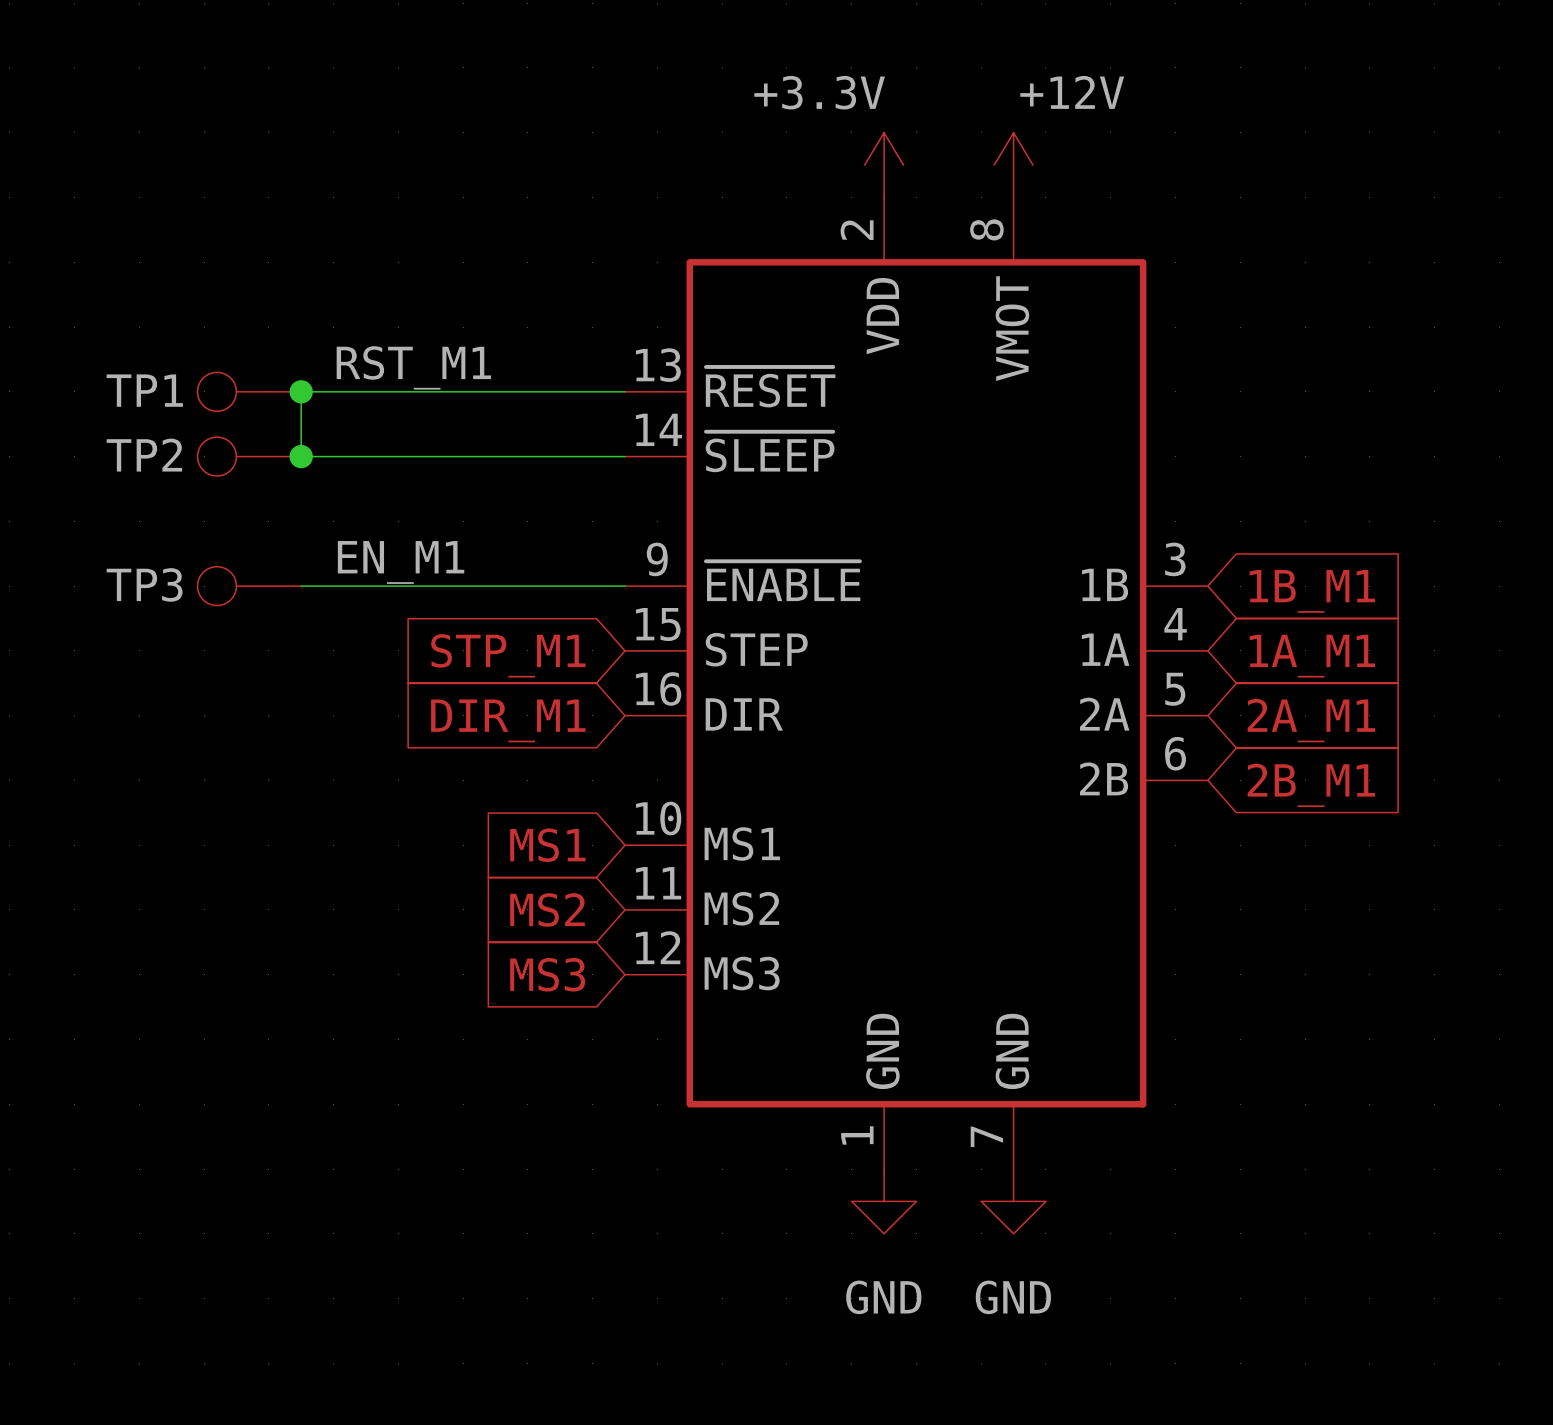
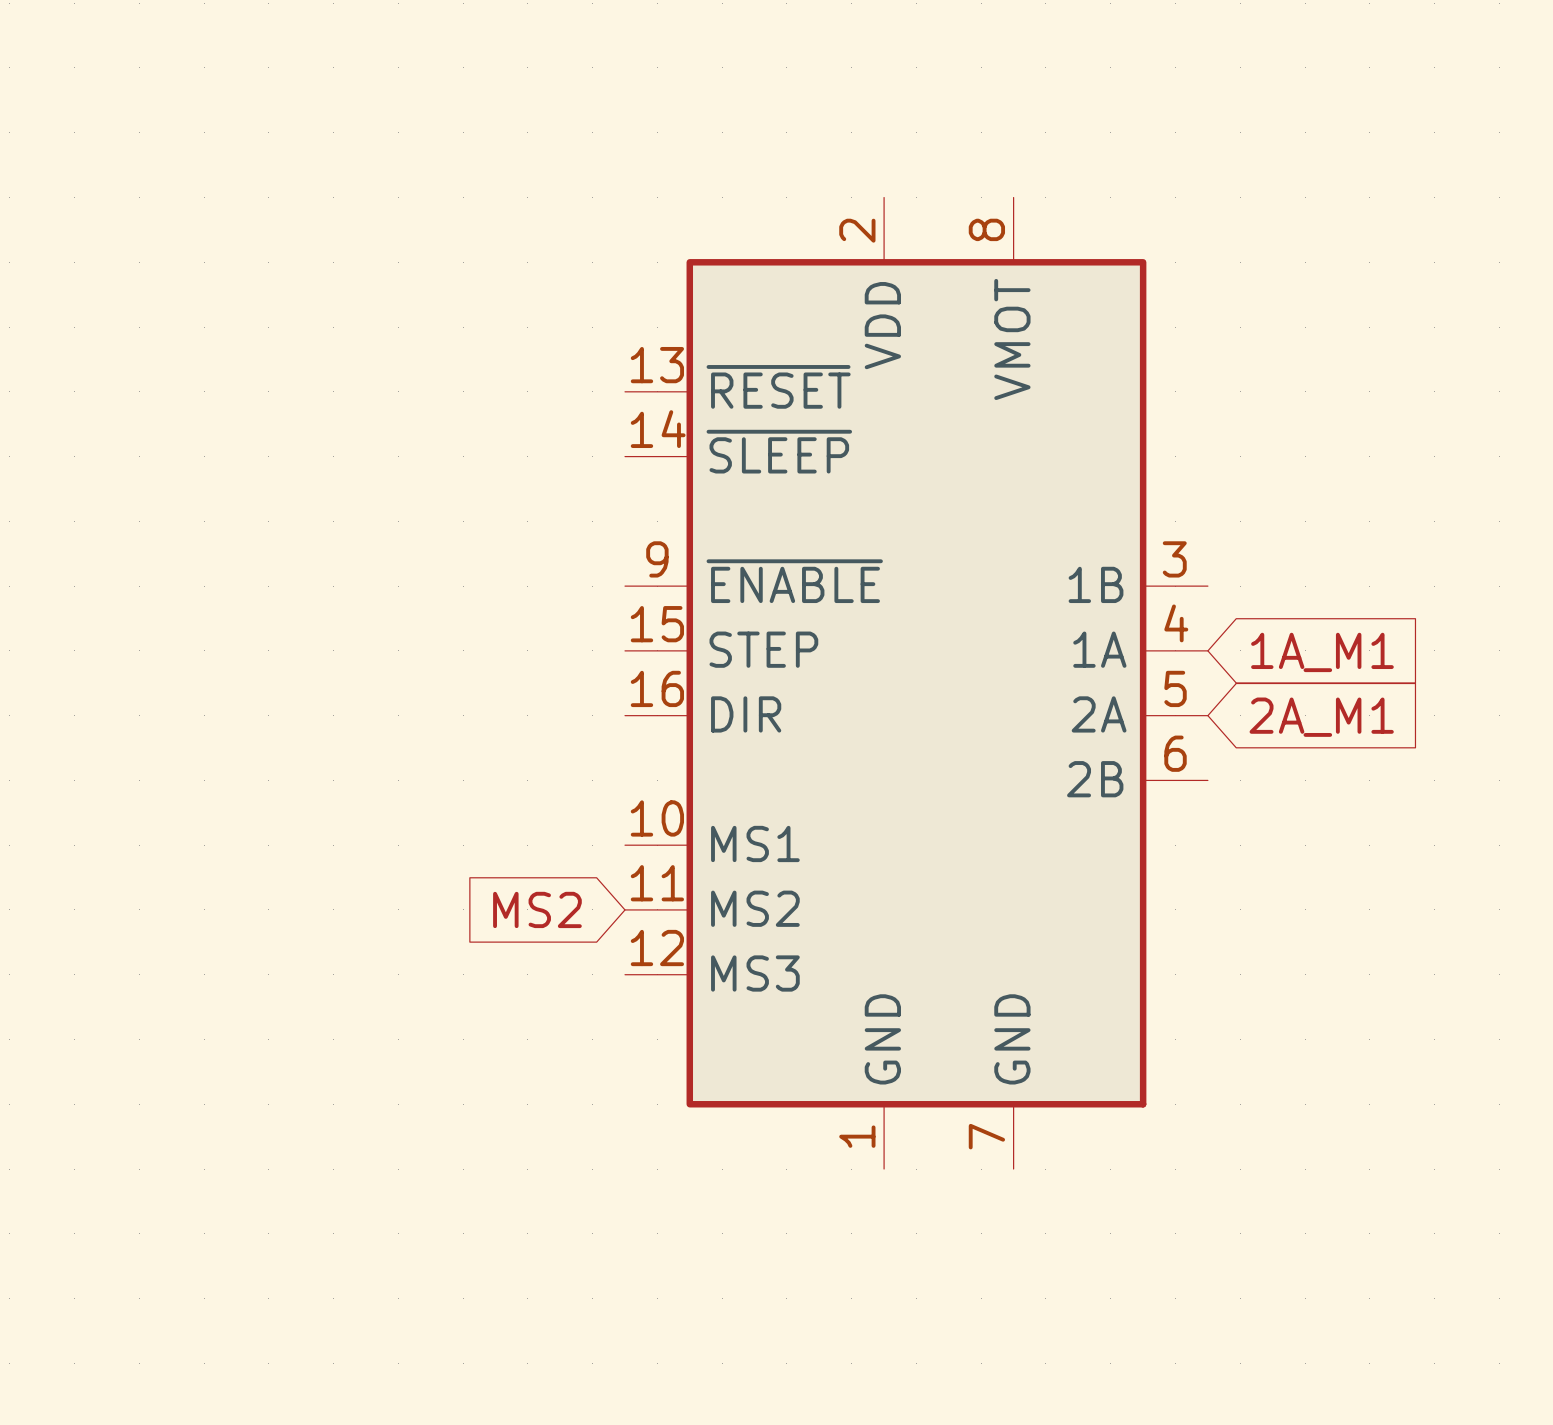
power symbol: +3.3V (884, 165) -> none
power symbol: +12V (1013, 165) -> none
label: RST_M1 (413, 367) -> none
TP1: (249, 391) -> none
junction: (301, 391) -> none
wire: (625, 391) (301, 391) (301, 456) (625, 456) -> none
TP2: (249, 456) -> none
junction: (301, 456) -> none
label: EN_M1 (401, 562) -> none
TP3: (249, 586) -> none
wire: (301, 586) (625, 586) -> none
global label: 1B_M1 (1312, 591) -> none
global label: STP_M1 (508, 655) -> none
global label: DIR_M1 (508, 720) -> none
global label: 2B_M1 (1311, 785) -> none
global label: MS1 (547, 845) -> none
global label: MS3 (547, 974) -> none
power symbol: GND (884, 1201) -> none
power symbol: GND (1013, 1201) -> none

